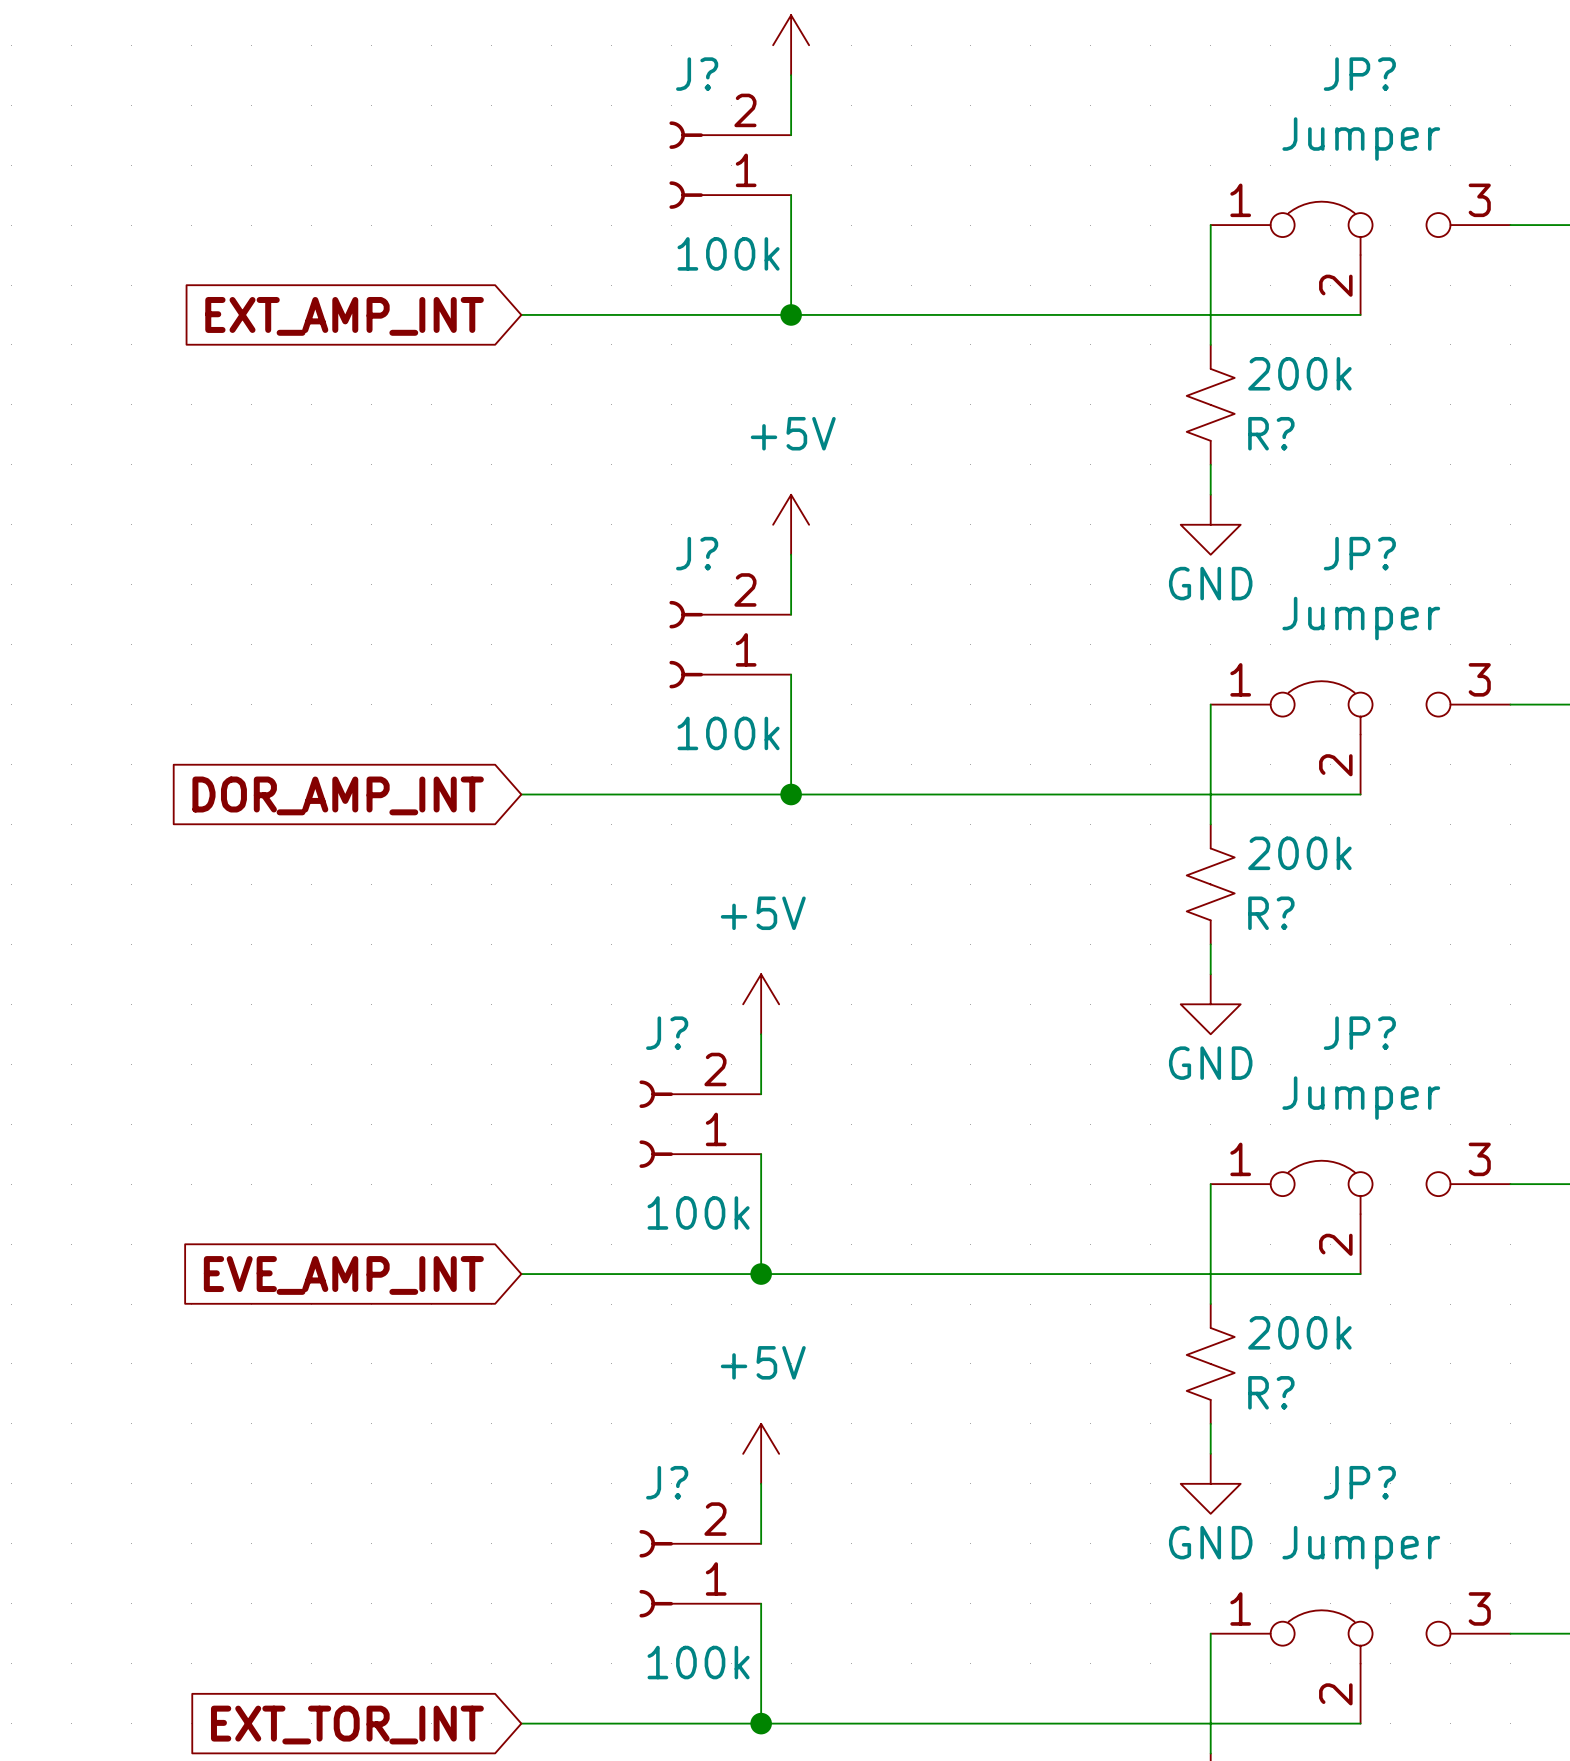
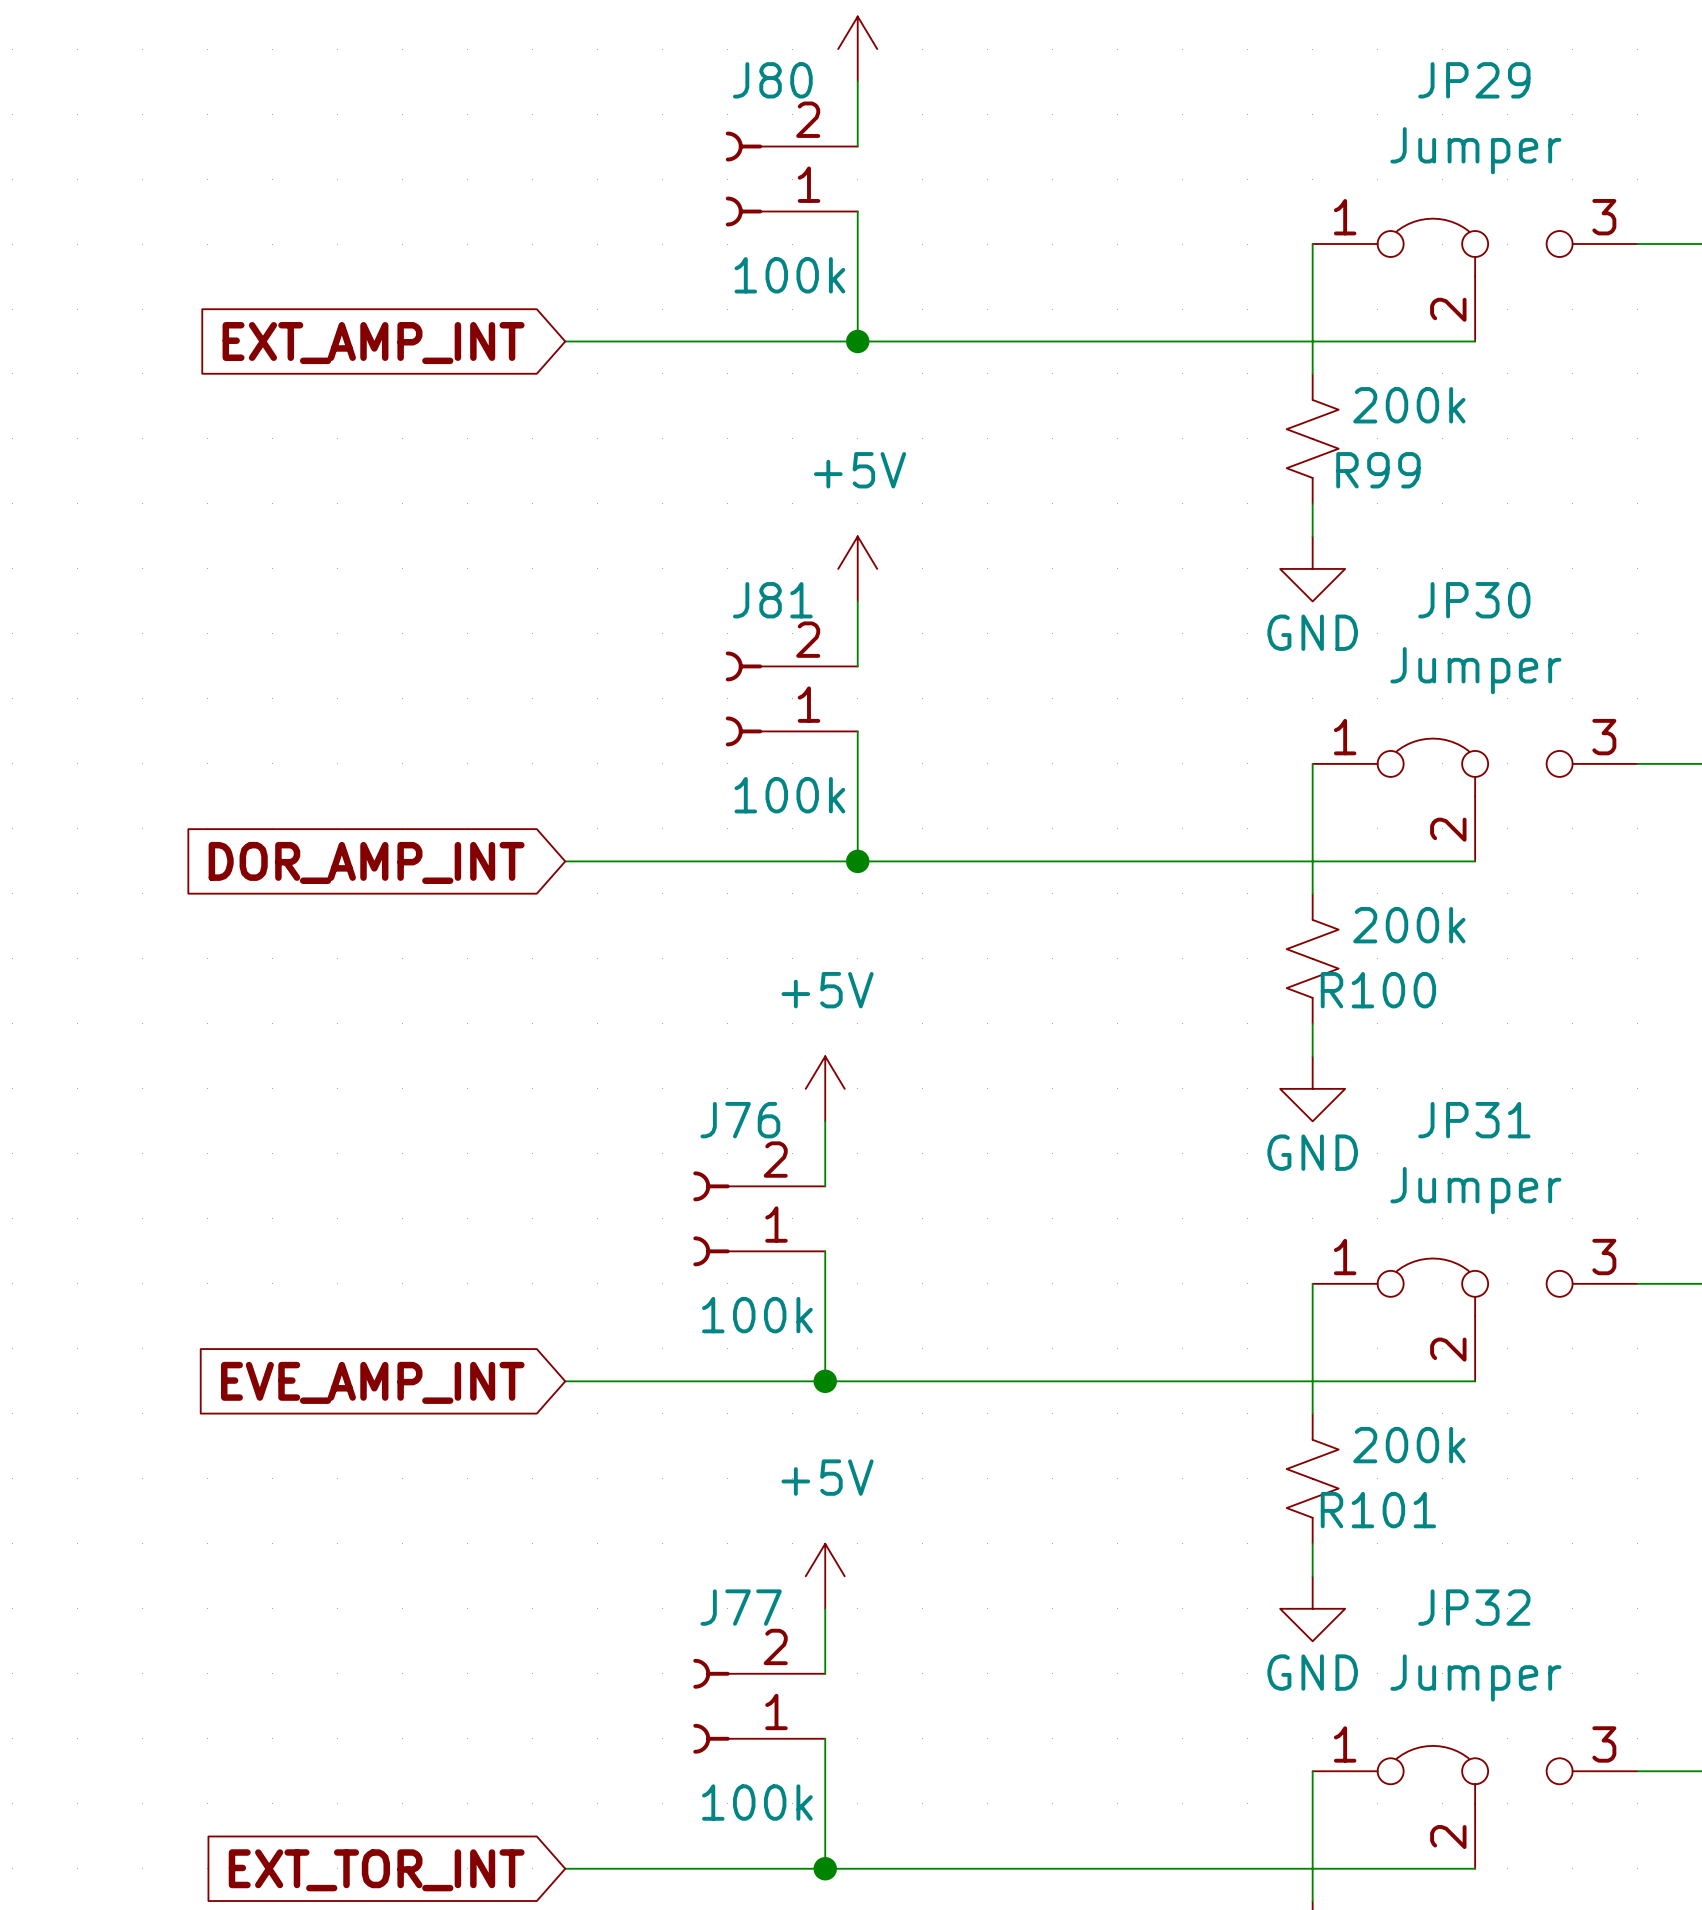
J? name: J? (697, 74) -> J80 (772, 80)
JP? name: JP? (1359, 74) -> JP29 (1474, 80)
R? name: R? (1271, 433) -> R99 (1378, 470)
J? name: J? (697, 553) -> J81 (772, 600)
JP? name: JP? (1359, 553) -> JP30 (1474, 600)
R? name: R? (1271, 913) -> R100 (1378, 990)
J? name: J? (667, 1033) -> J76 (740, 1120)
JP? name: JP? (1359, 1033) -> JP31 (1474, 1120)
R? name: R? (1271, 1392) -> R101 (1378, 1510)
J? name: J? (667, 1482) -> J77 (741, 1607)
JP? name: JP? (1359, 1482) -> JP32 (1474, 1607)

